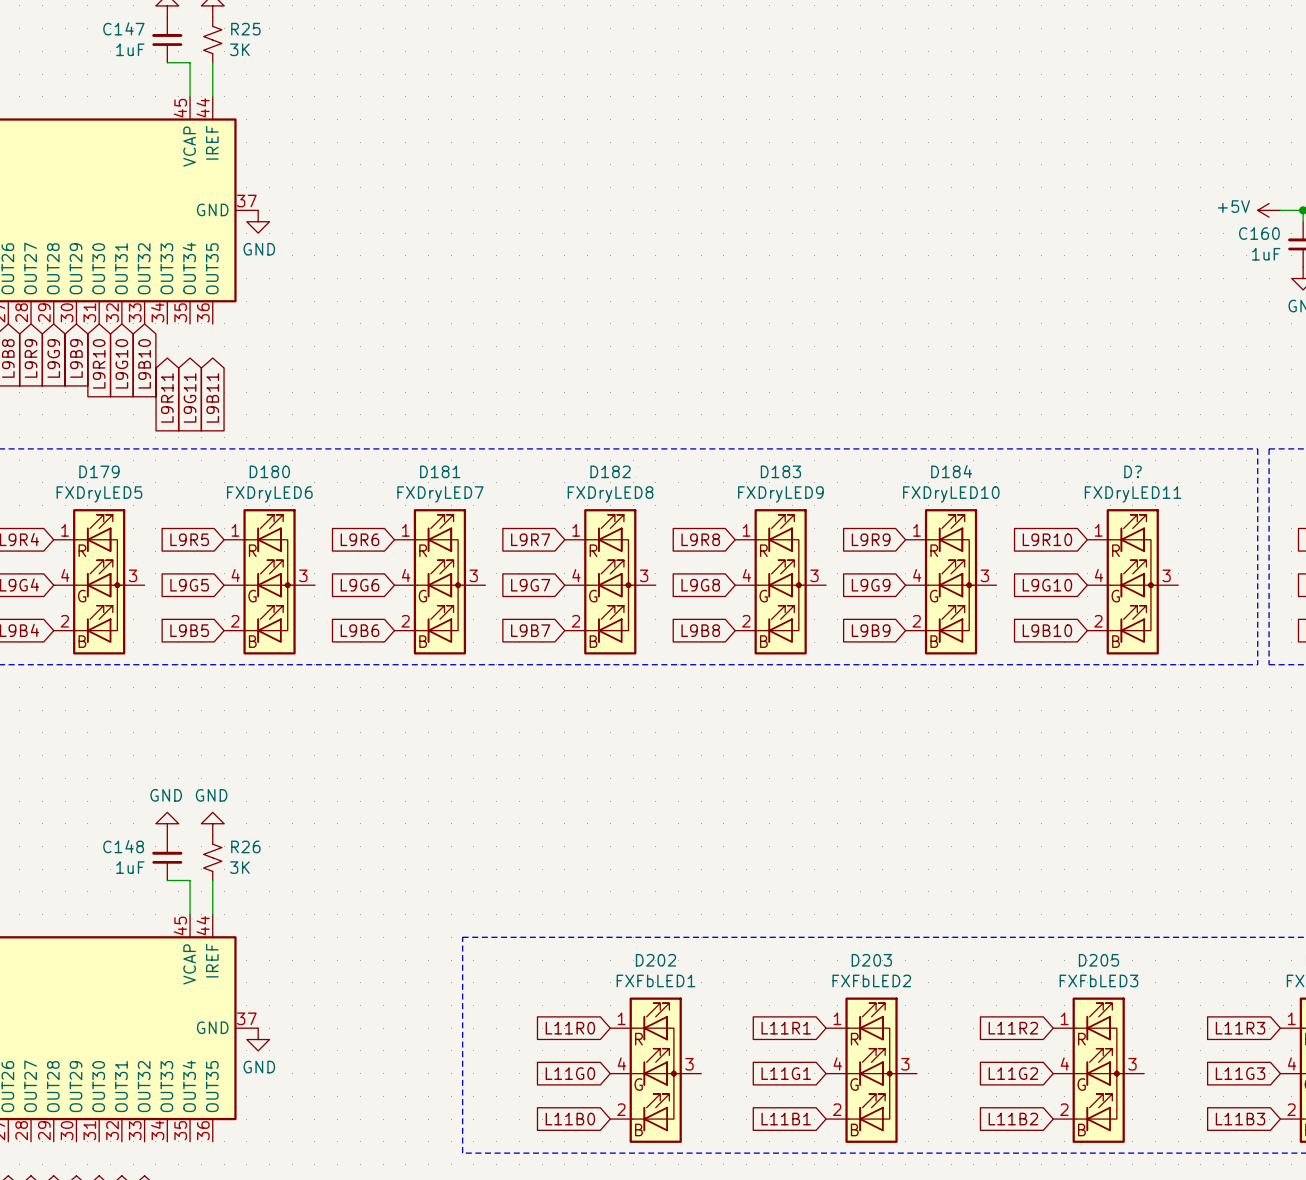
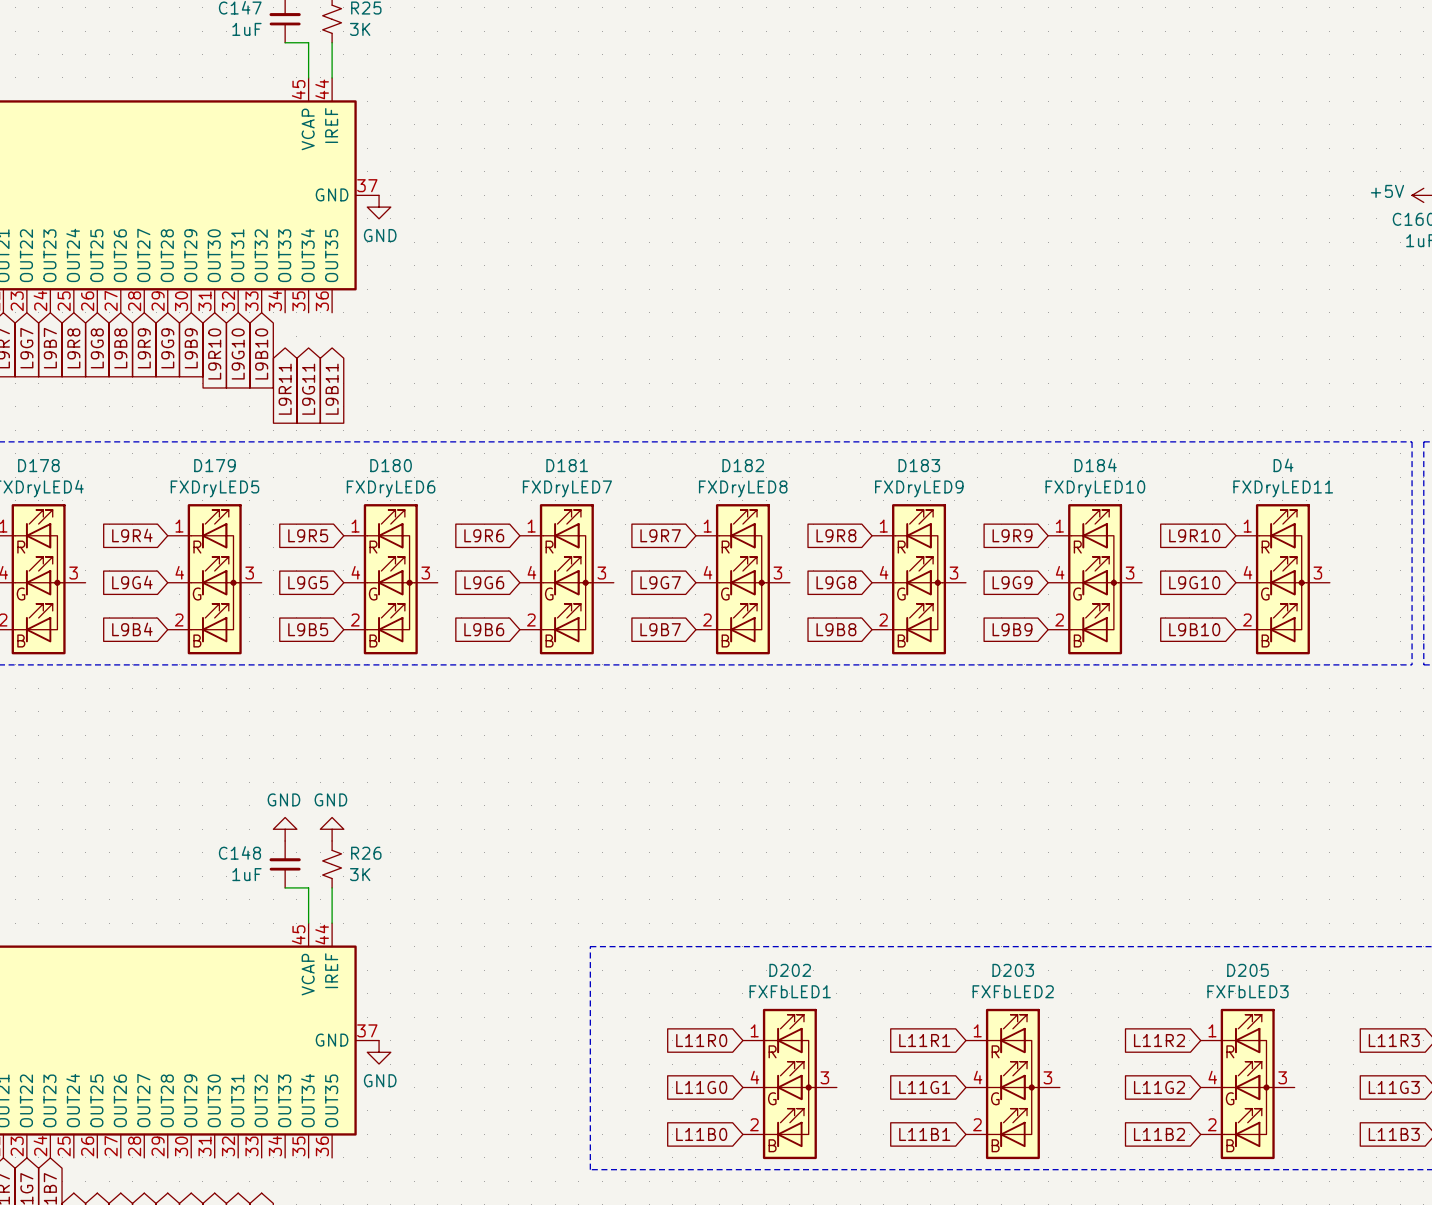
D? name: D? (1133, 471) -> D4 (1283, 465)

